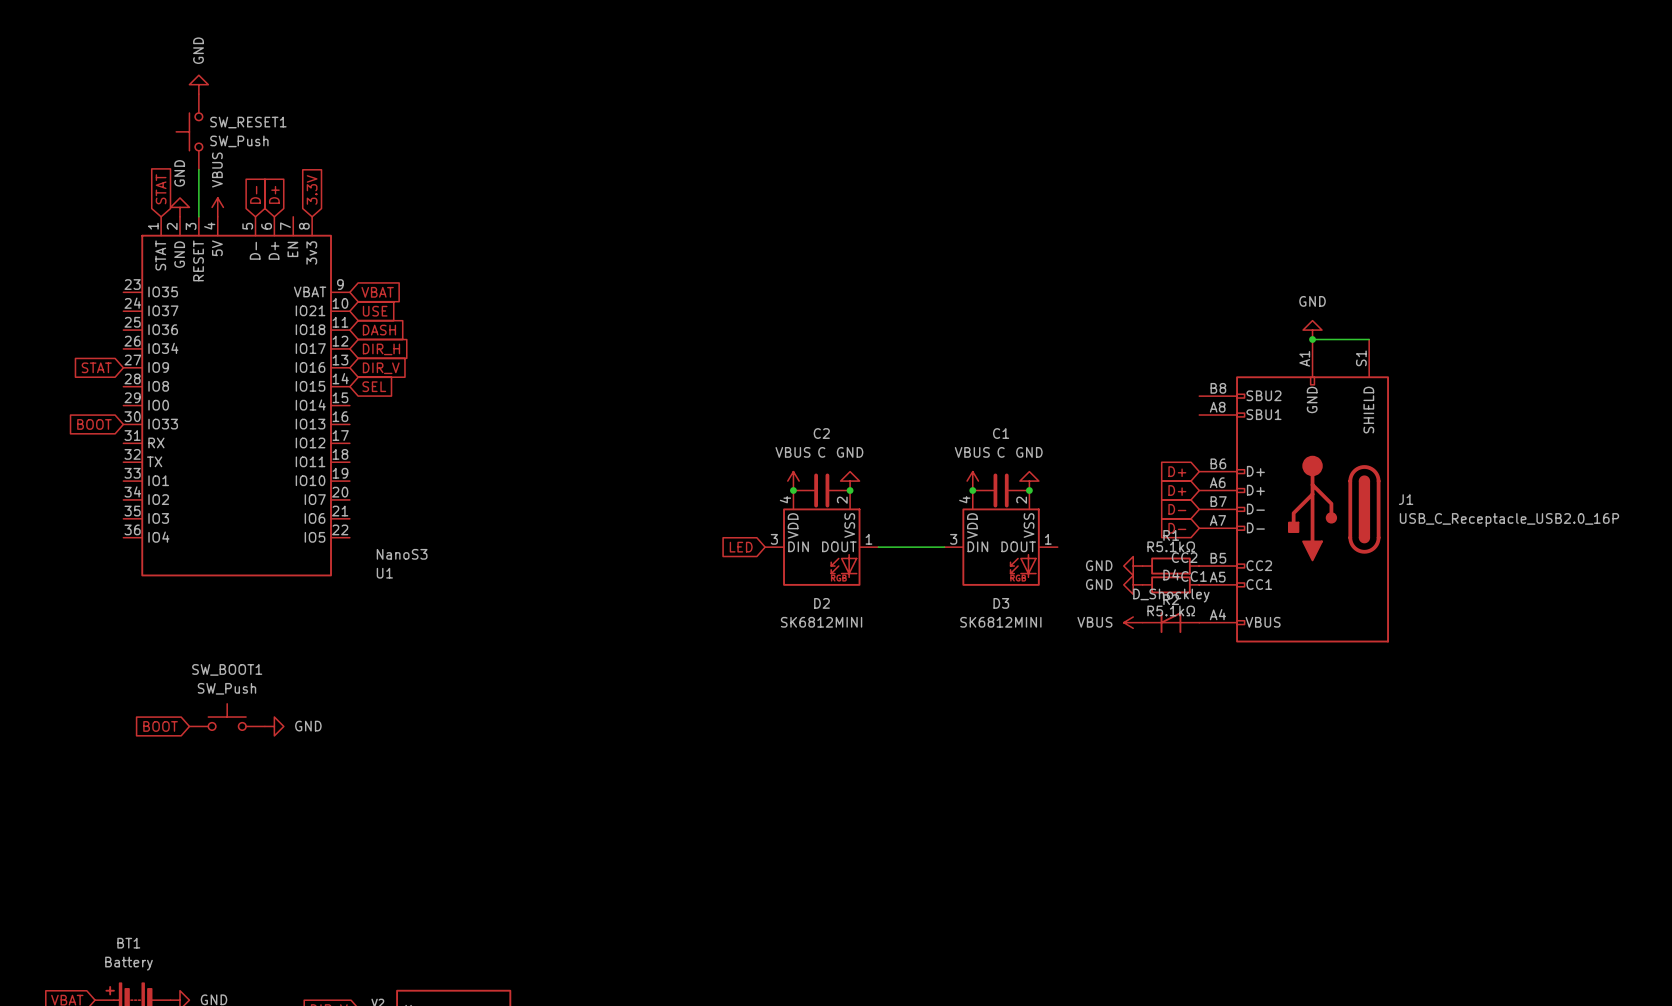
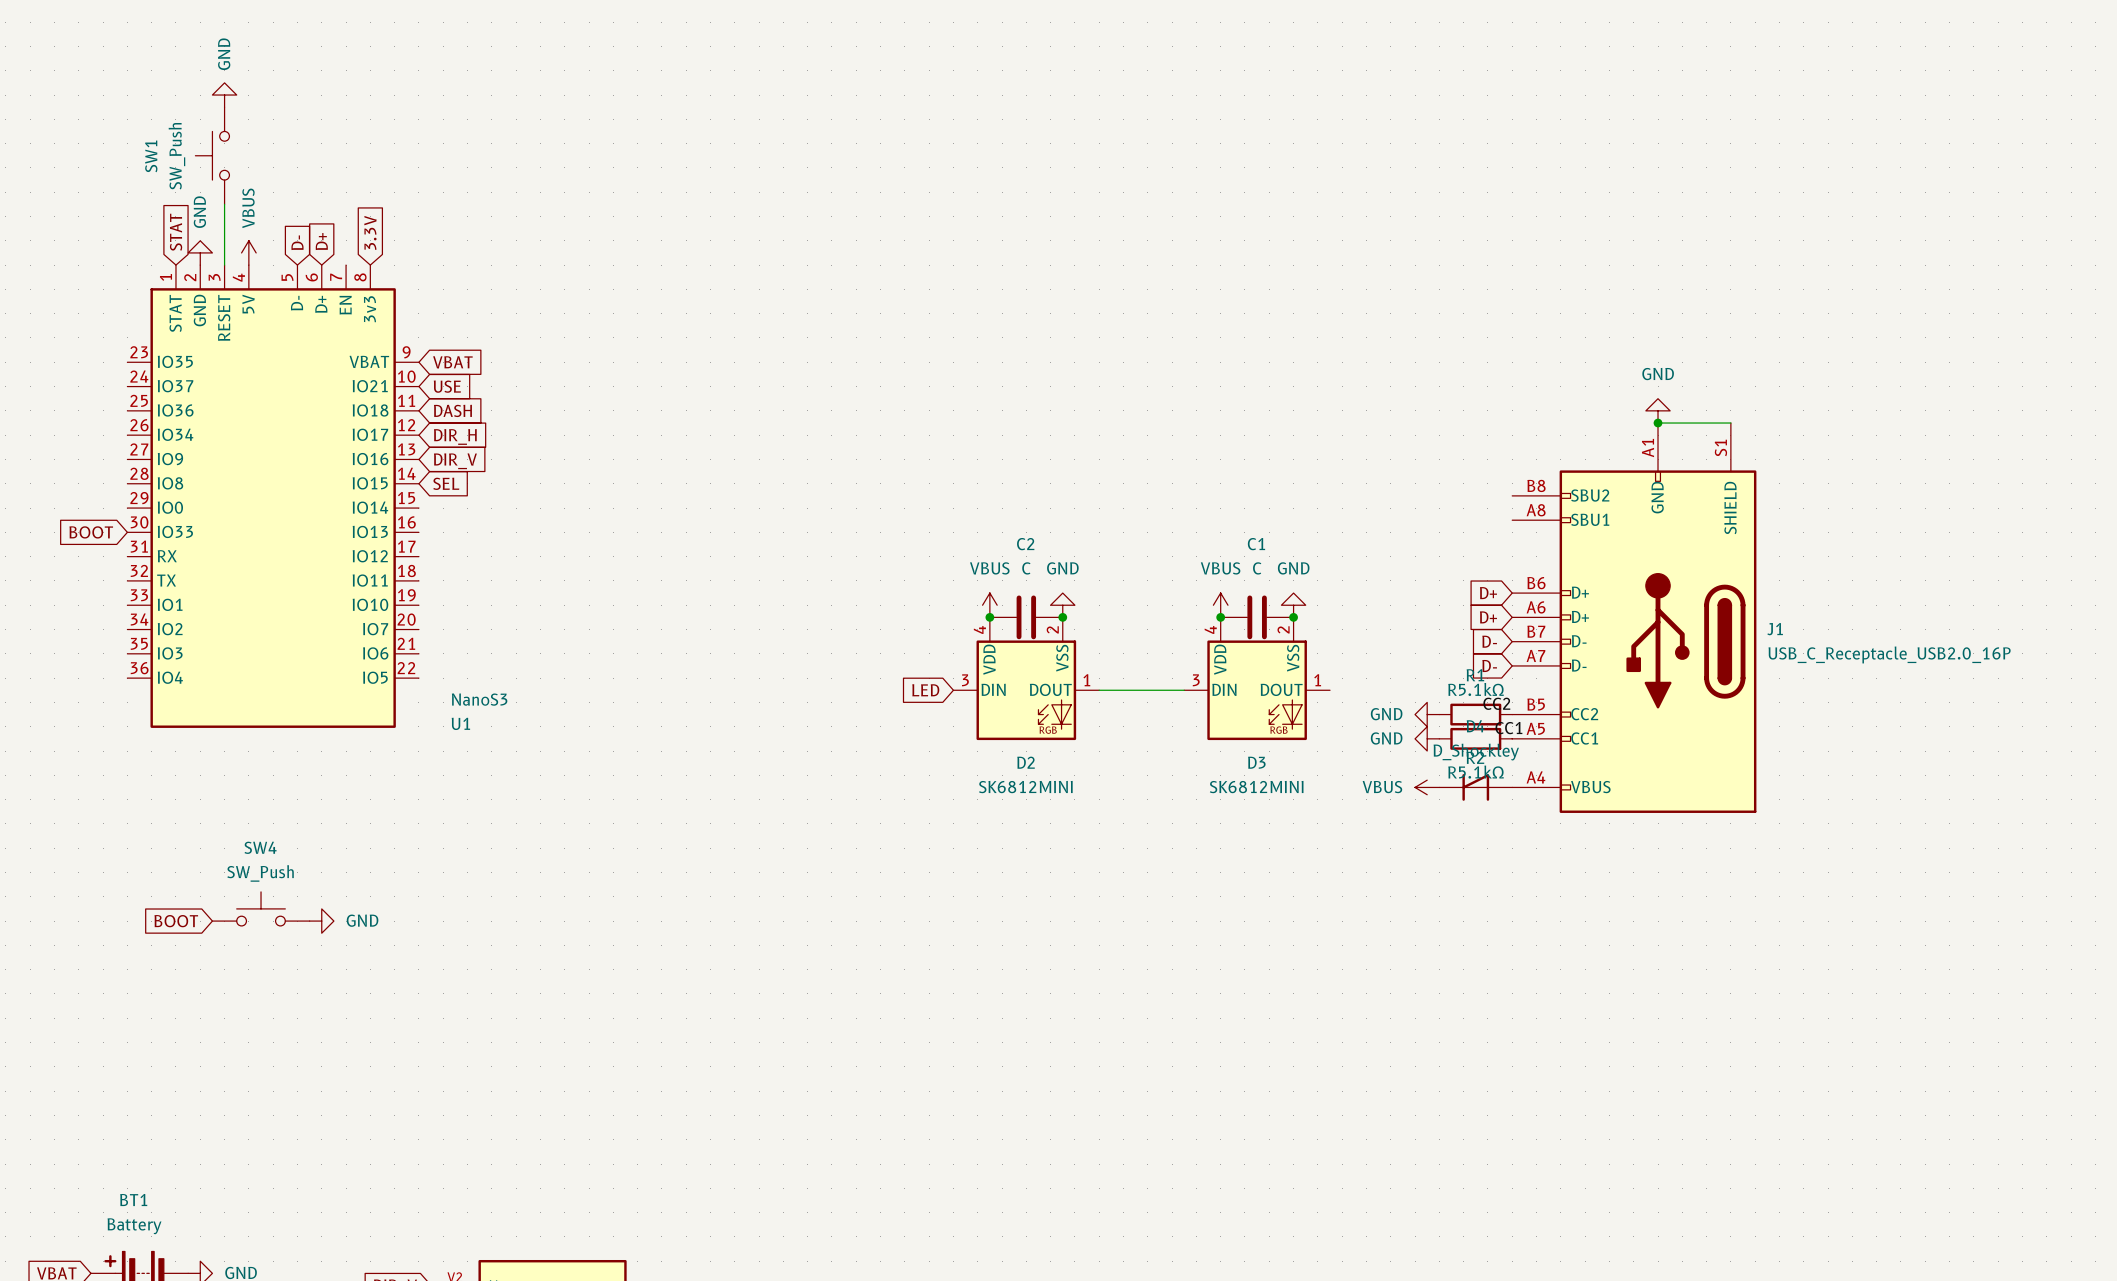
SW_RESET1 name: SW_RESET1 (248, 122) -> SW1 (151, 156)
SW_RESET1 value rotation: 0° (239, 141) -> 90° counterclockwise (176, 156)
SW_RESET1 value position: SW_Push (239, 141) -> SW_Push (176, 156)
global label: STAT (96, 367) -> none
SW_BOOT1 name: SW_BOOT1 (227, 669) -> SW4 (260, 847)

